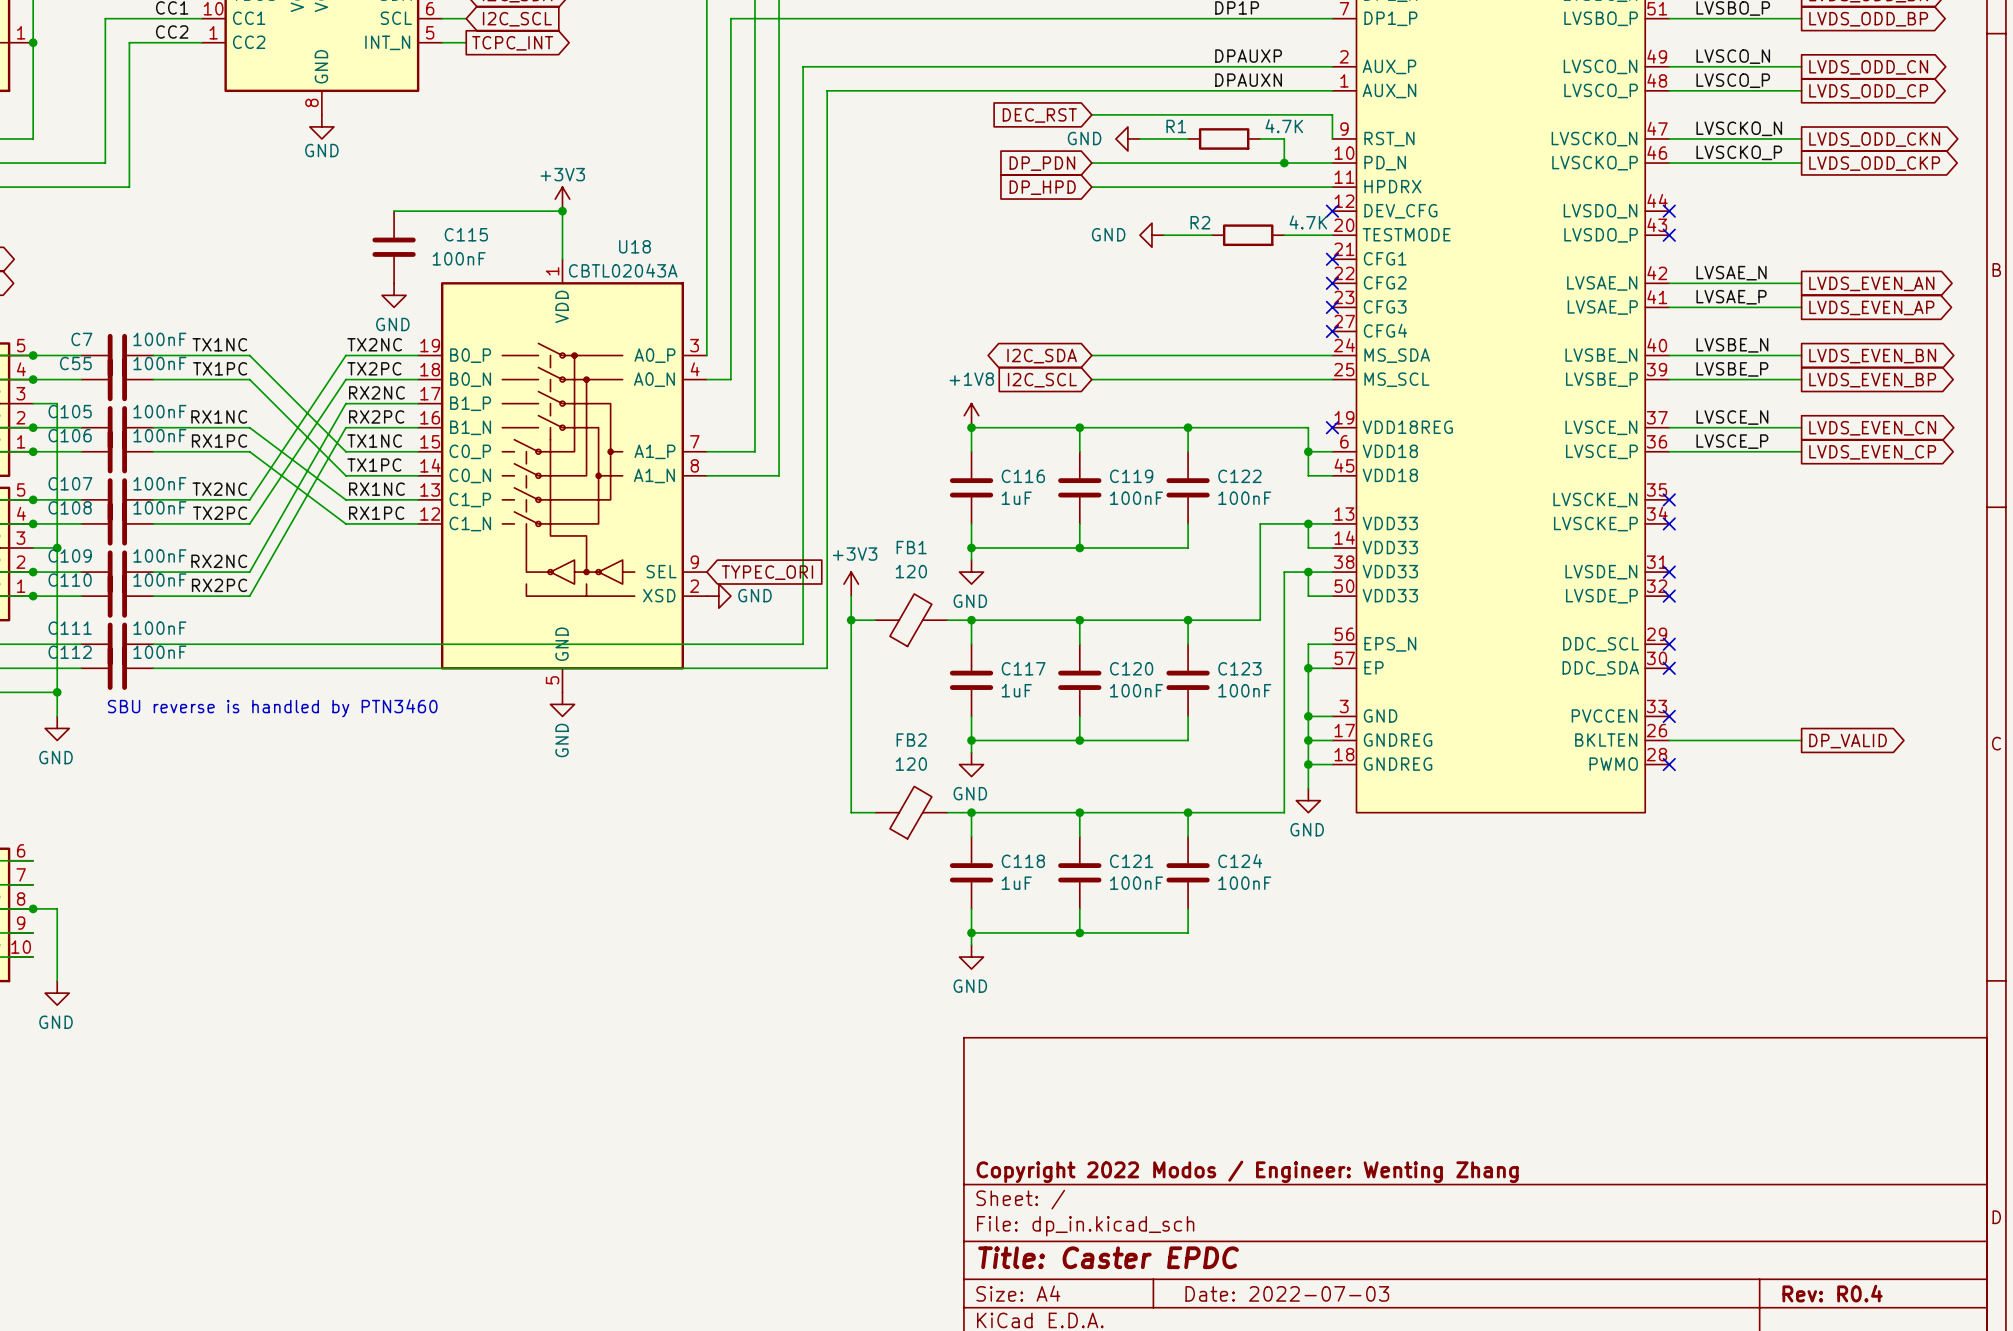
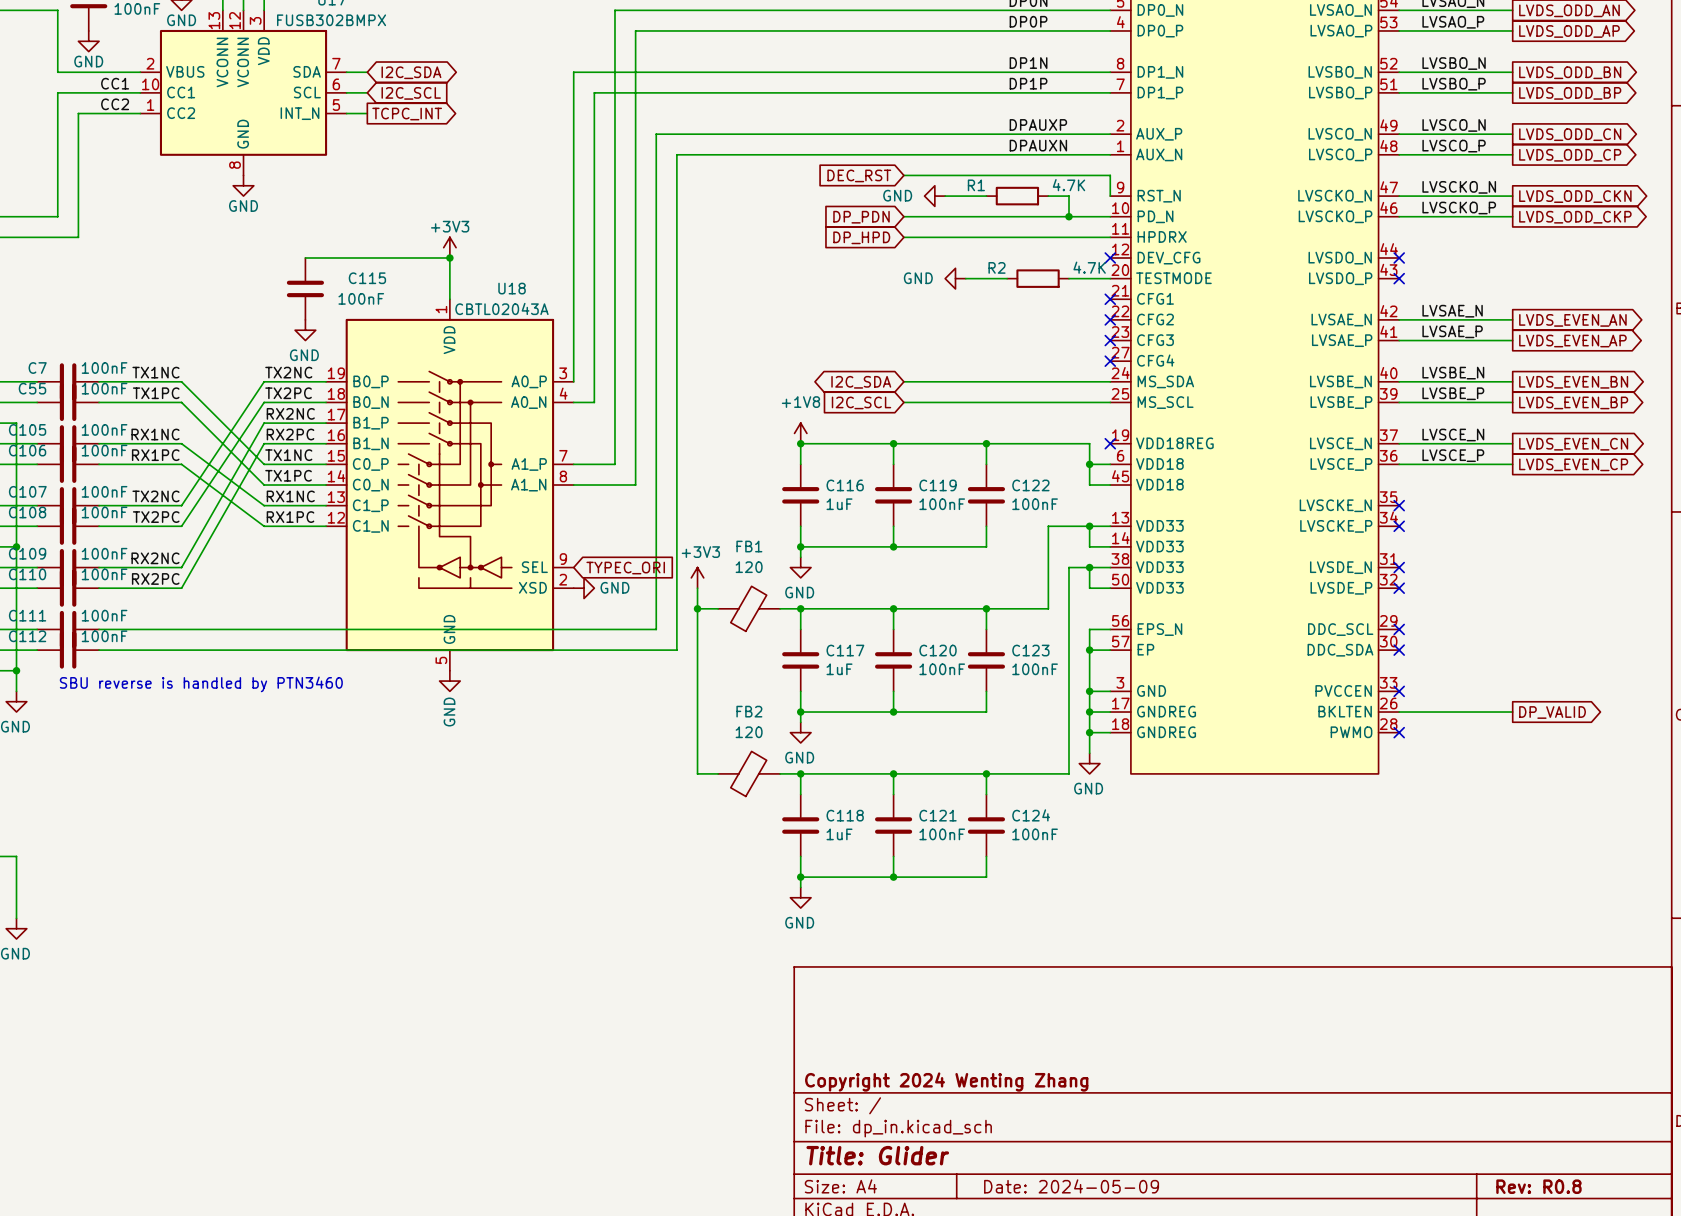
title block: Copyright 2022 Modos / Engineer: Wenting Zhang (1247, 1171) -> Copyright 2024 Wenting Zhang (946, 1082)
title block: Title: Caster EPDC (1108, 1257) -> Title: Glider (877, 1155)
title block: Date: 2022-07-03 (1287, 1293) -> Date: 2024-05-09 (1071, 1186)
title block: Rev: R0.4 (1832, 1293) -> Rev: R0.8 (1538, 1186)

